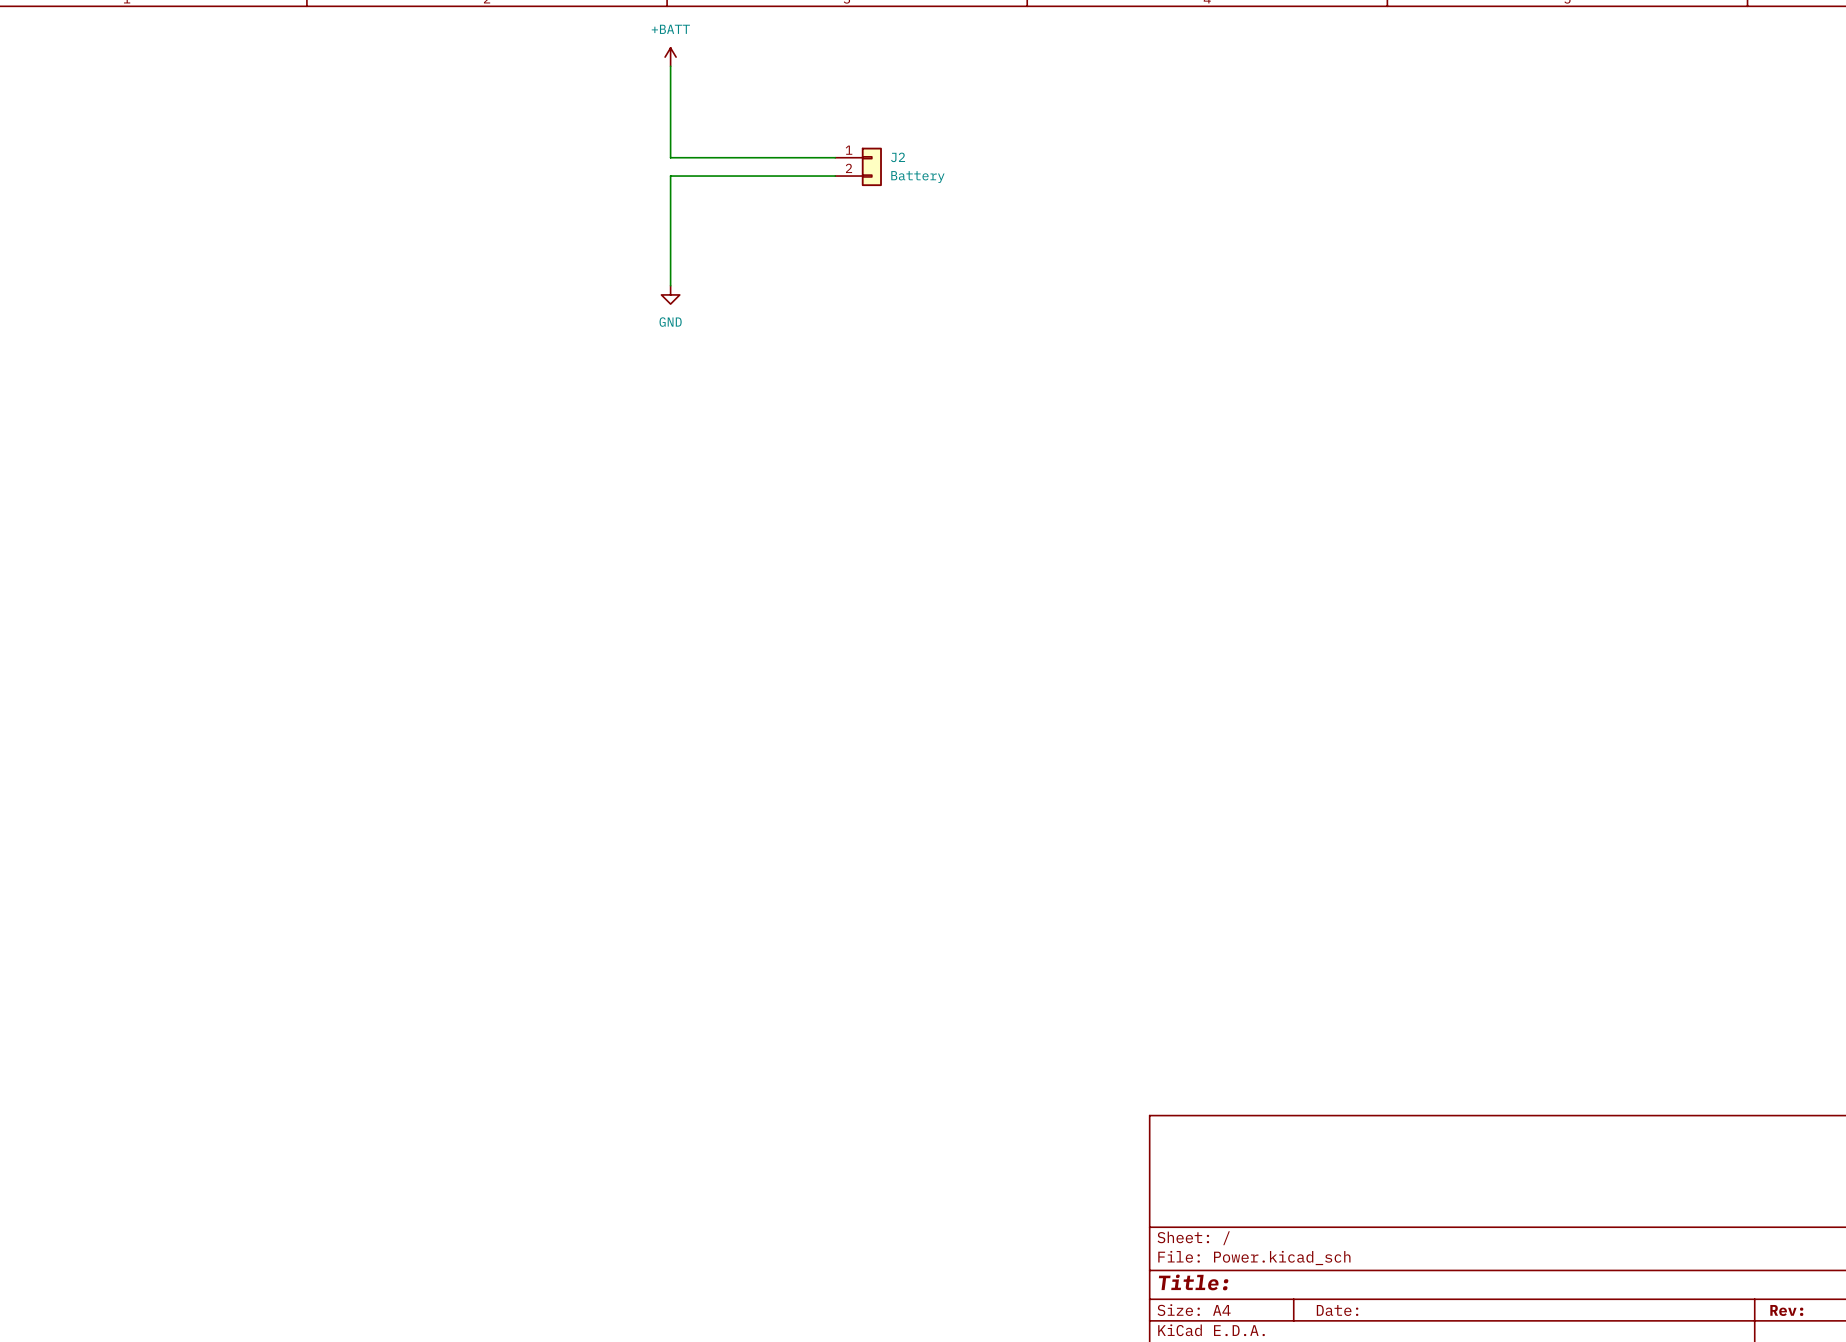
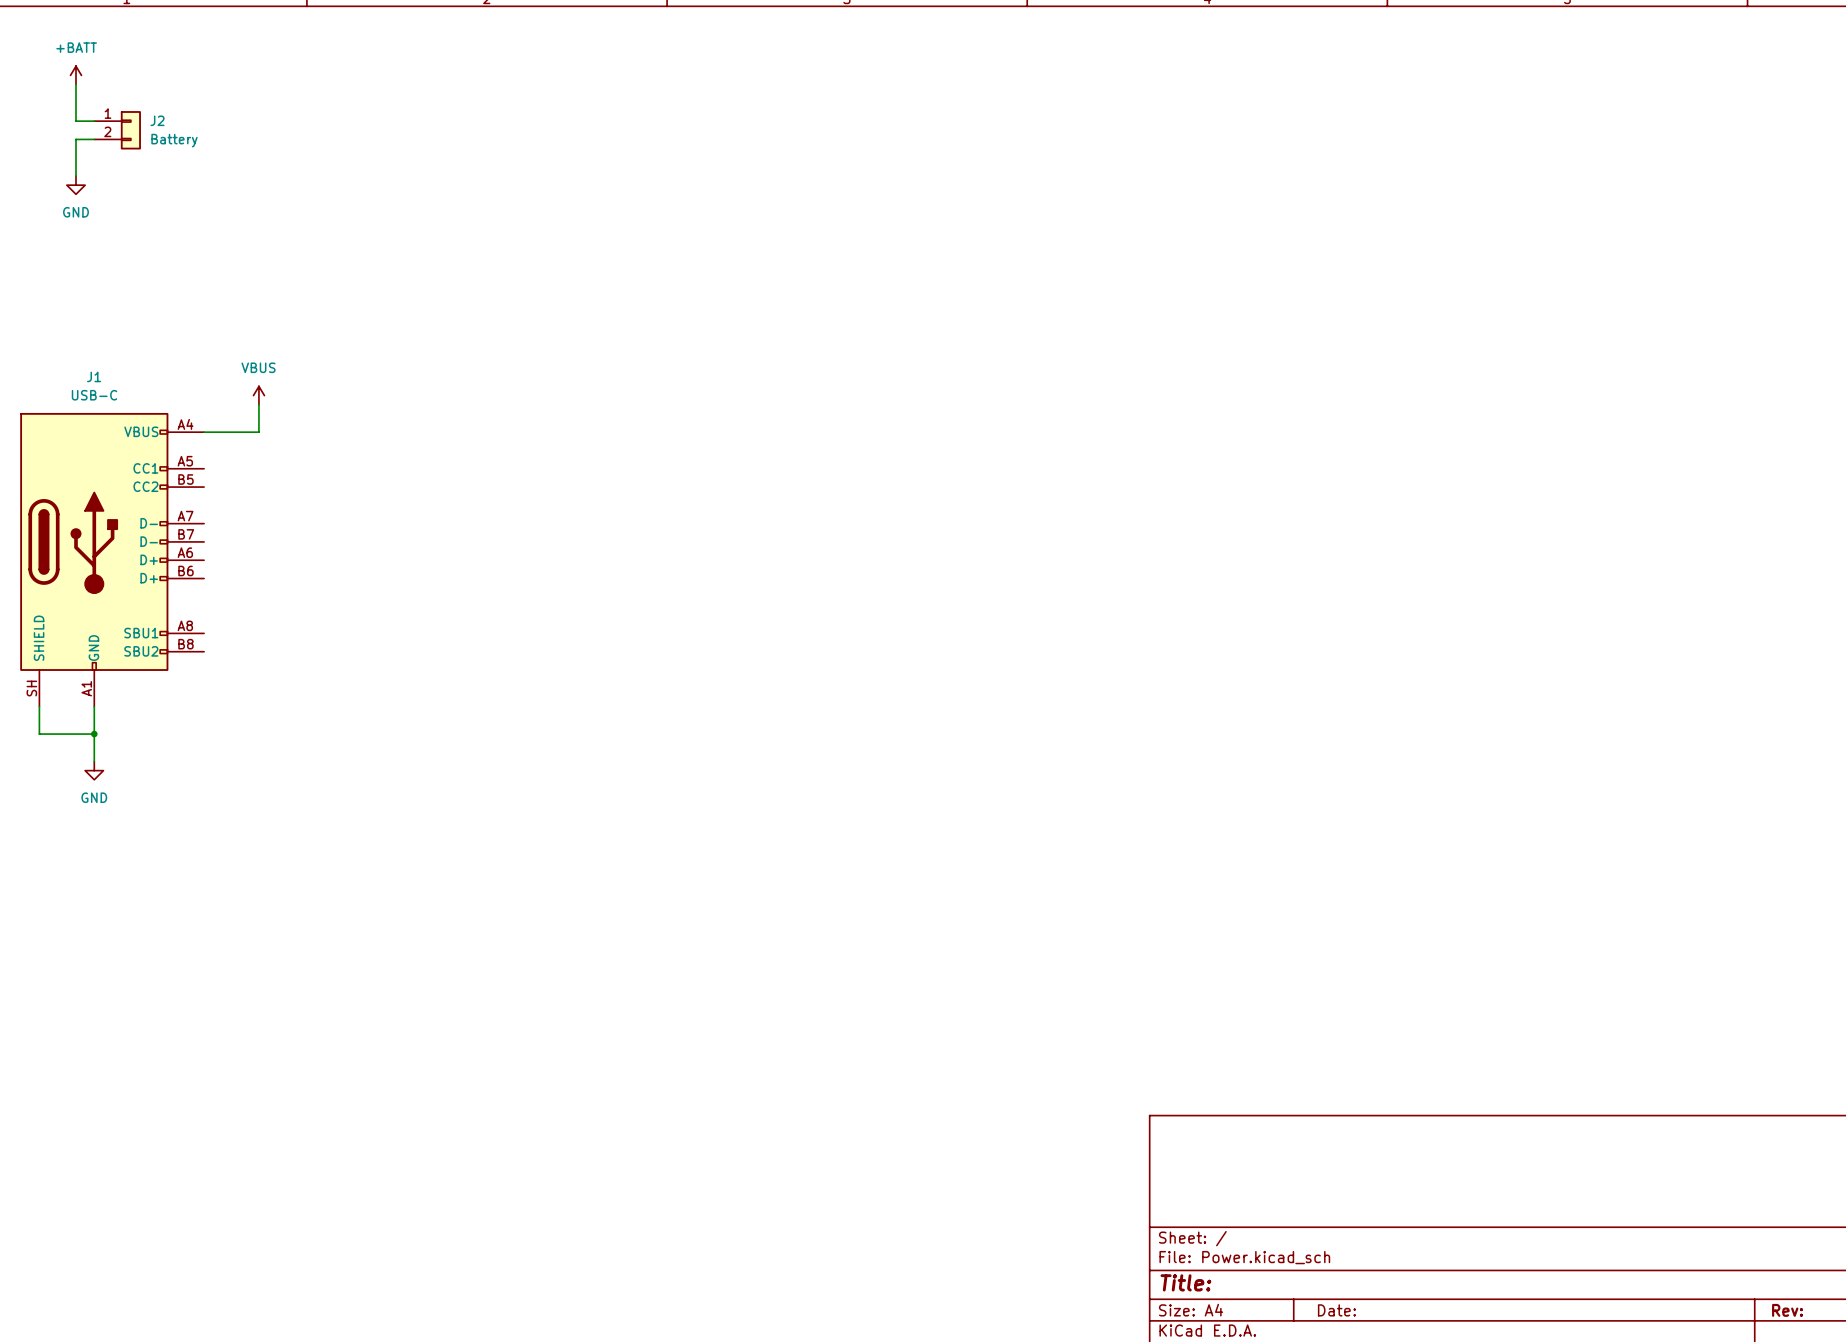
power symbol: +BATT (670, 57) -> none
wire: (670, 66) (670, 157) (835, 157) -> none
power symbol: none -> +BATT (75, 75)
wire: none -> (75, 84) (75, 121) (94, 121)
wire: none -> (94, 139) (75, 139) (75, 176)
J2 position: (858, 166) -> (117, 130)
wire: (835, 176) (670, 176) (670, 285) -> none
power symbol: none -> GND (75, 185)
power symbol: GND (670, 294) -> none
power symbol: none -> VBUS (258, 395)
wire: none -> (258, 404) (258, 432) (204, 432)
J1: none -> USB-C (112, 559)
wire: none -> (39, 706) (39, 734) (94, 734)
wire: none -> (94, 706) (94, 761)
junction: none -> (94, 734)
power symbol: none -> GND (94, 770)

